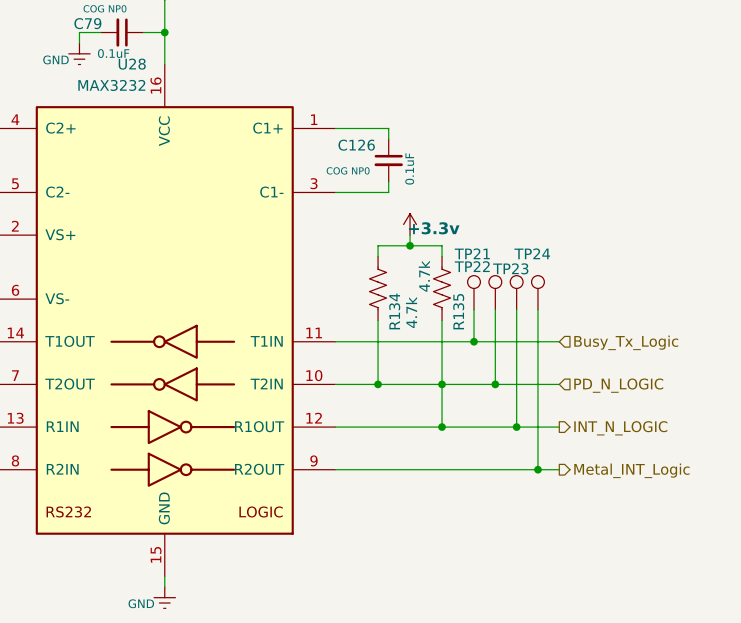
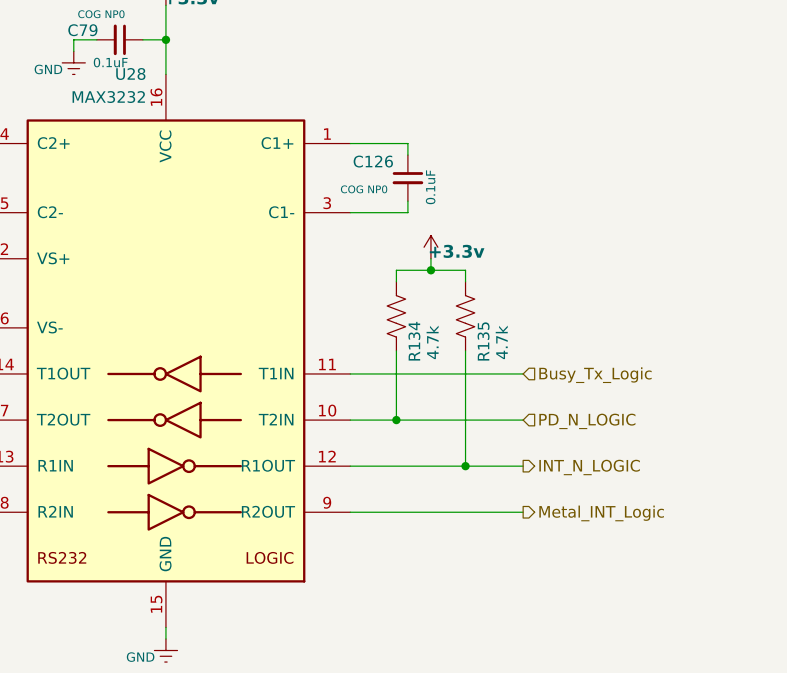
R135 value position: 4.7k (424, 276) -> 4.7k (501, 342)
TP21: (474, 292) -> none
TP22: (495, 292) -> none
TP23: (516, 292) -> none
TP24: (537, 292) -> none
wire: (474, 309) (474, 341) -> none
wire: (495, 309) (495, 384) (559, 384) -> none
wire: (516, 309) (516, 427) -> none
wire: (537, 309) (537, 469) -> none
junction: (474, 341) -> none
wire: (495, 341) (559, 341) -> none
hierarchical label position: Busy_Tx_Logic (626, 342) -> Busy_Tx_Logic (595, 375)
junction: (442, 384) -> none
junction: (495, 384) -> none
hierarchical label position: PD_N_LOGIC (618, 385) -> PD_N_LOGIC (587, 421)
wire: (495, 427) (559, 427) -> none
junction: (516, 427) -> none
hierarchical label position: INT_N_LOGIC (620, 428) -> INT_N_LOGIC (589, 467)
wire: (495, 469) (559, 469) -> none
junction: (537, 469) -> none
hierarchical label position: Metal_INT_Logic (631, 470) -> Metal_INT_Logic (601, 513)

